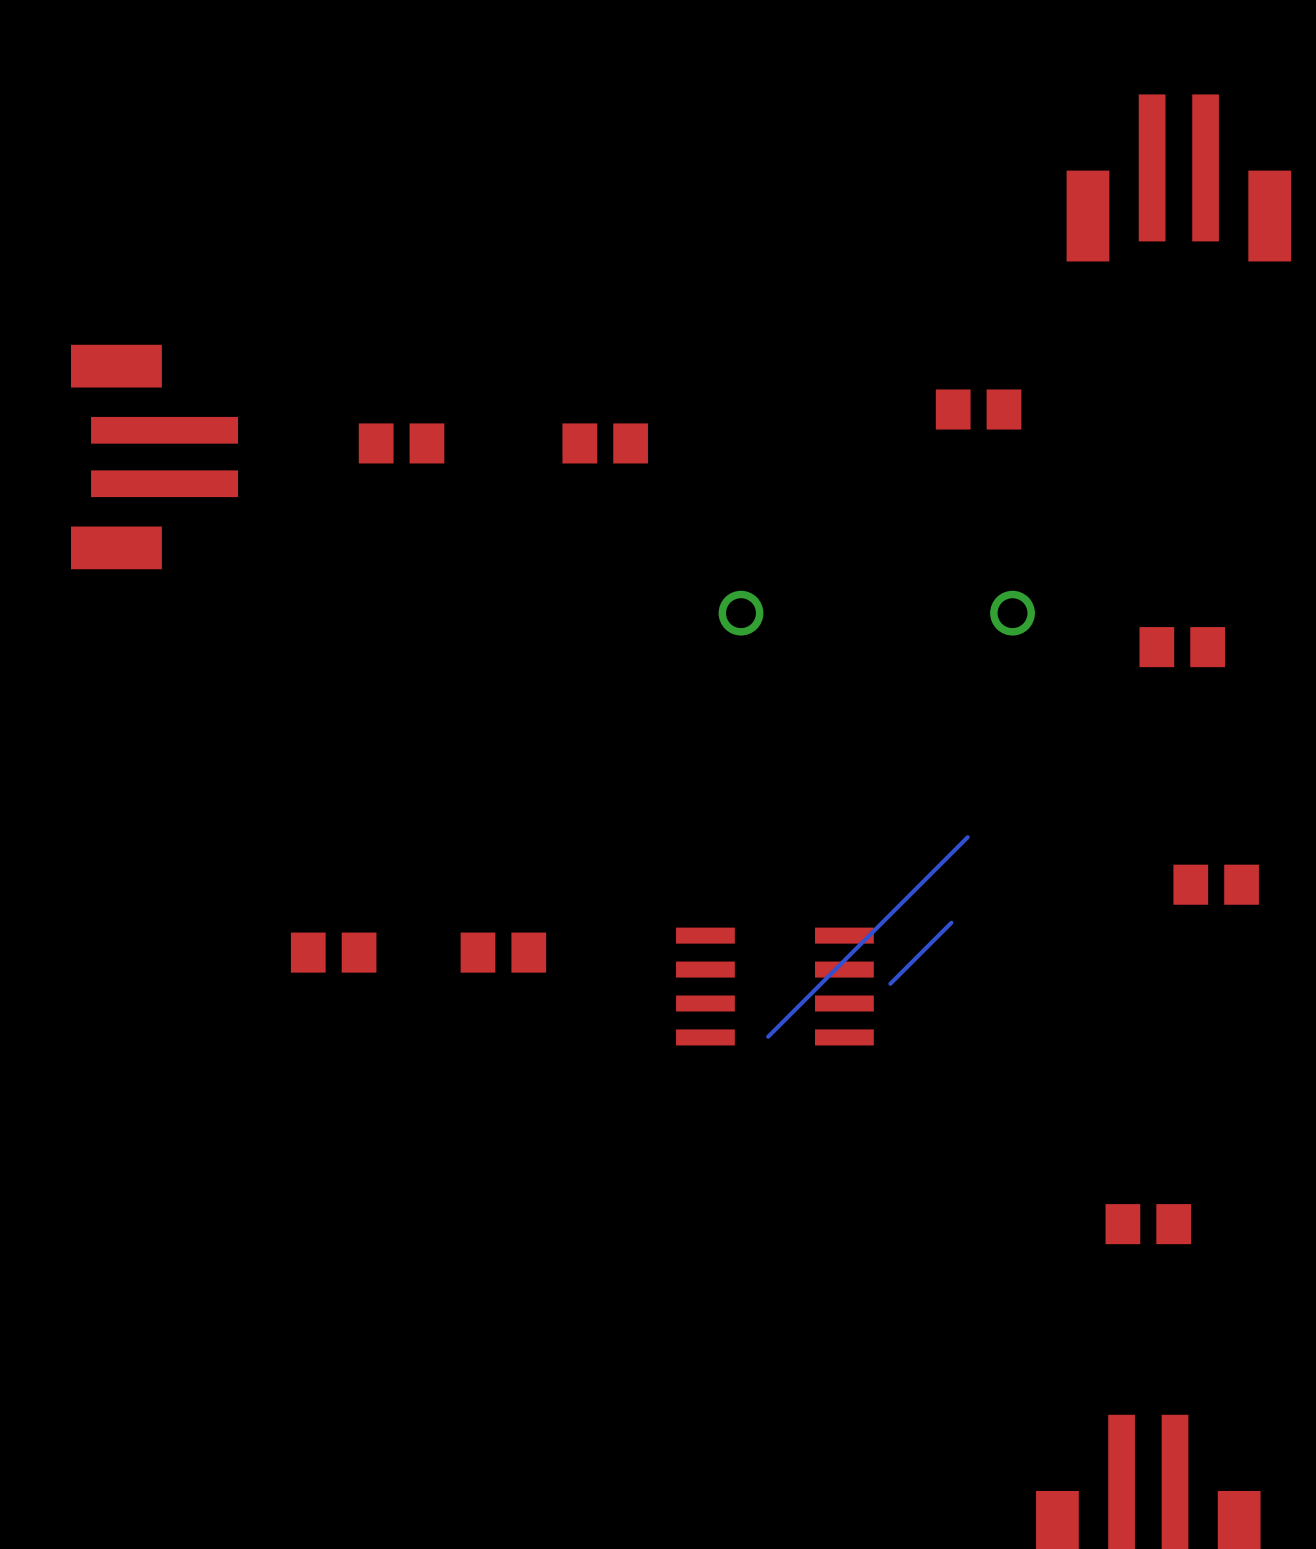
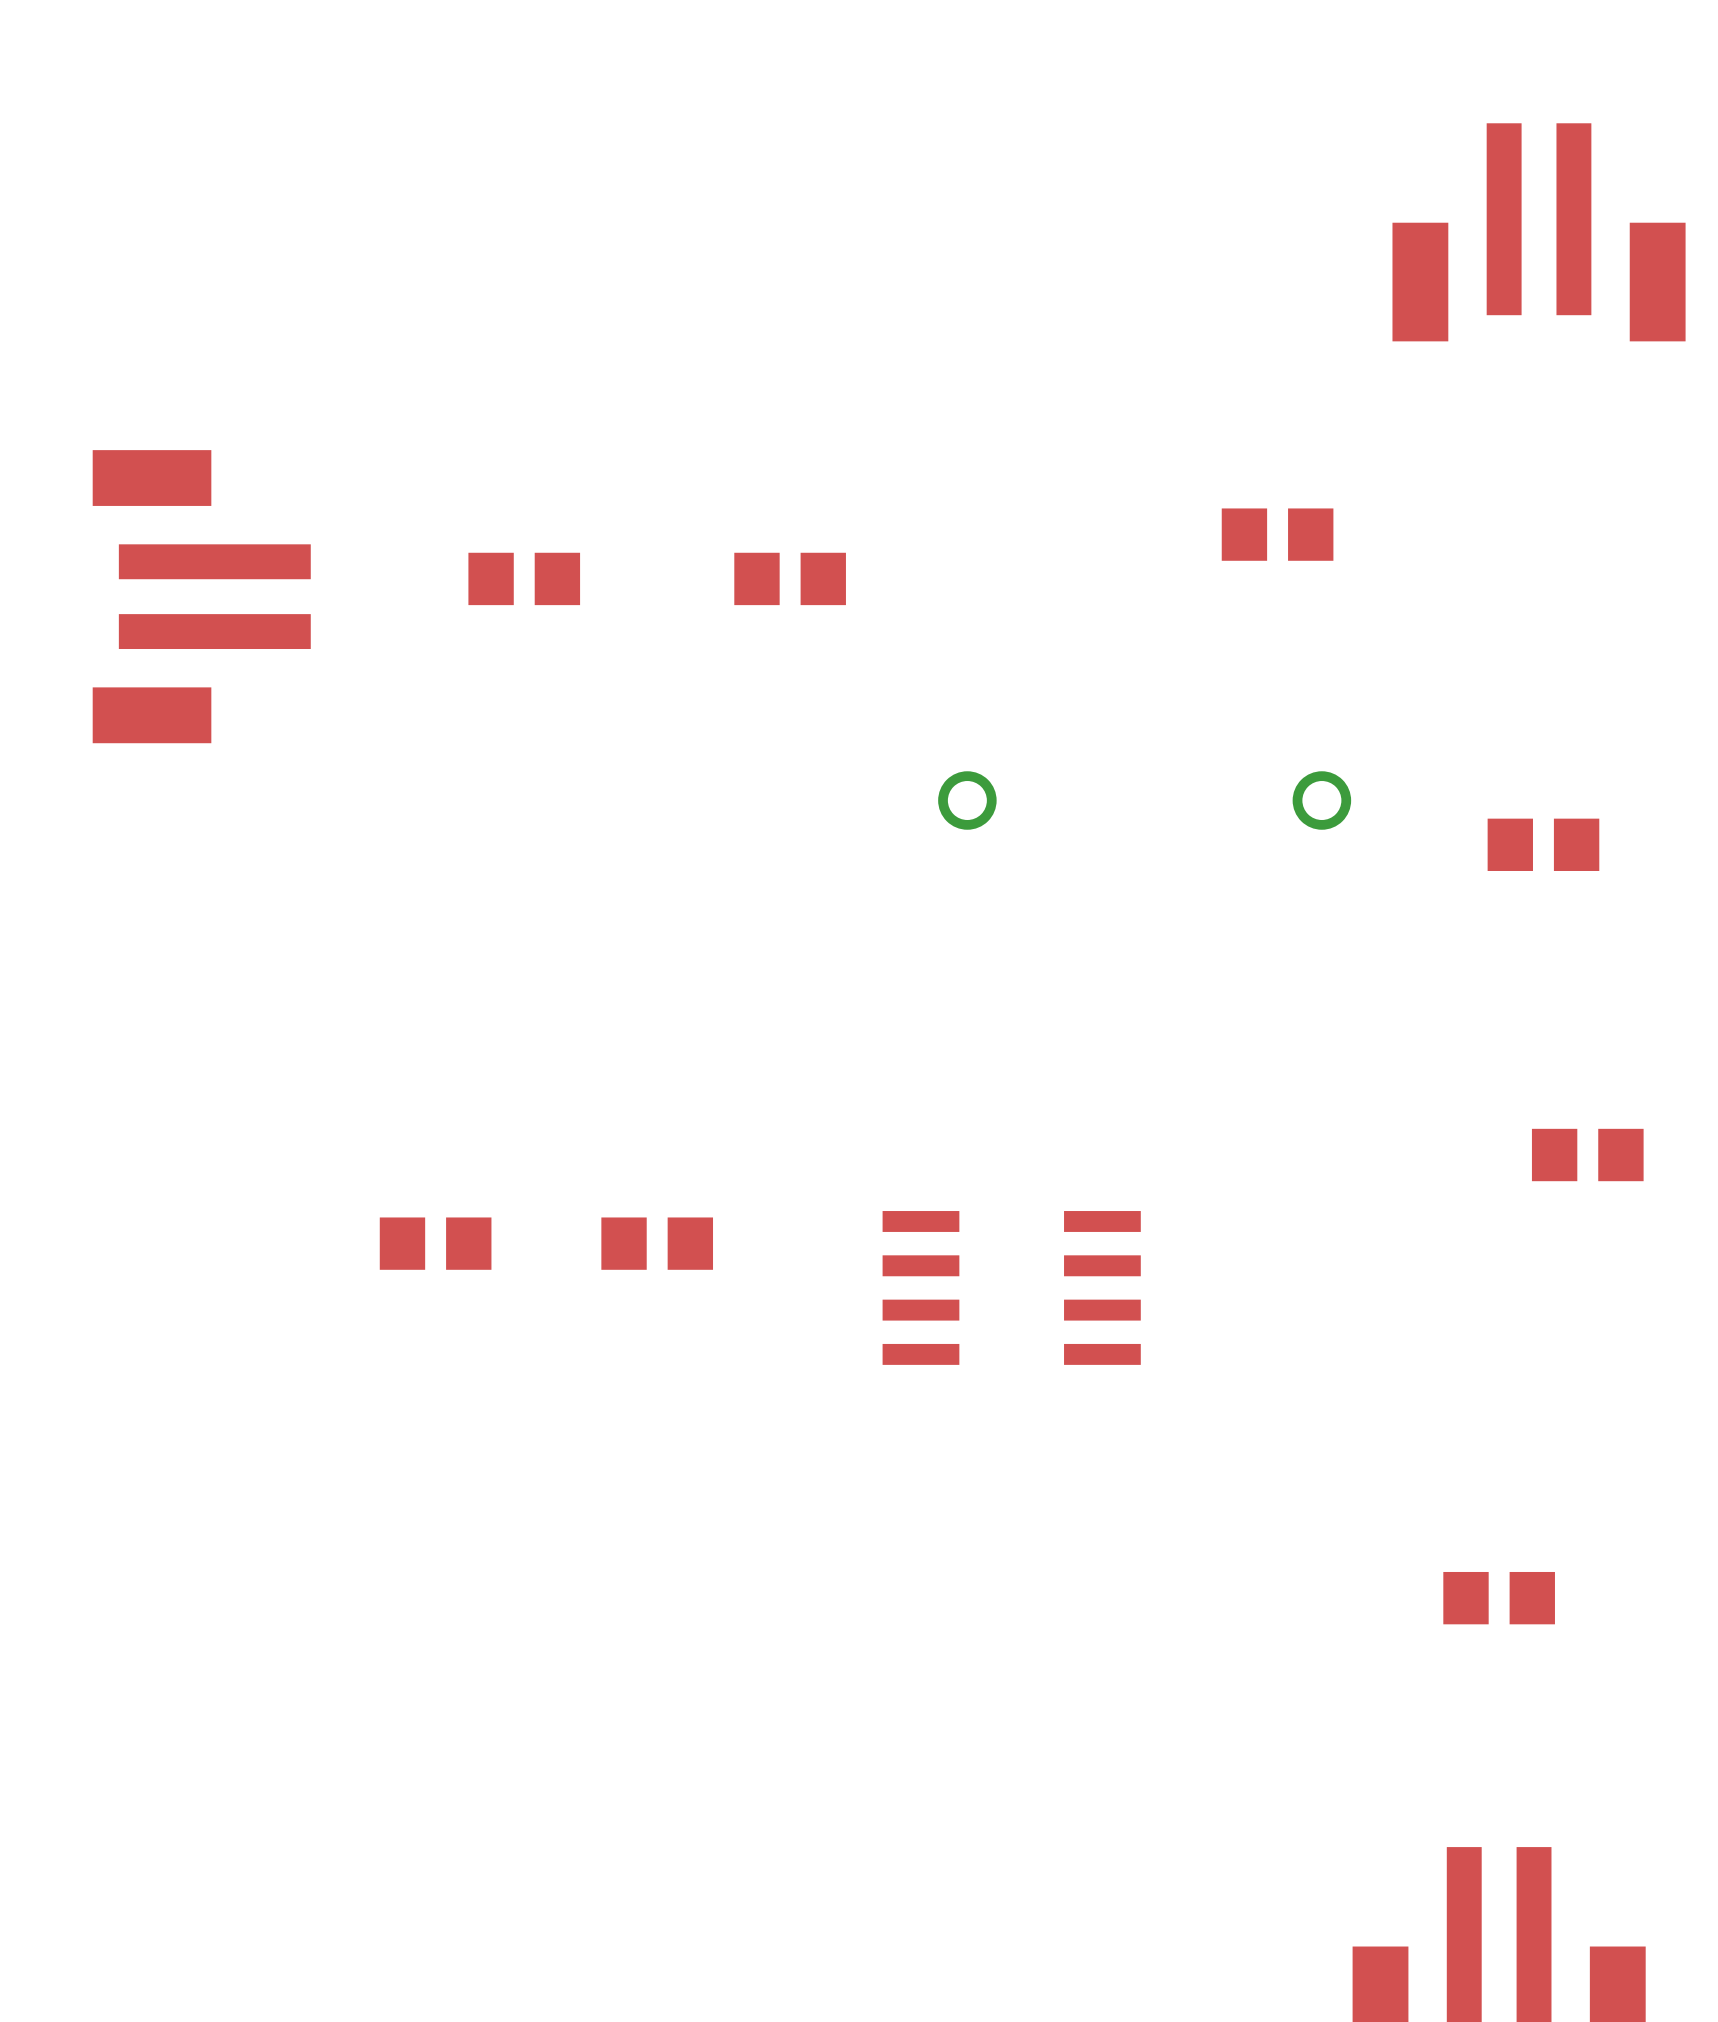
bottom track: (967, 837) (768, 1036) -> none
bottom track: (951, 922) (890, 983) -> none

